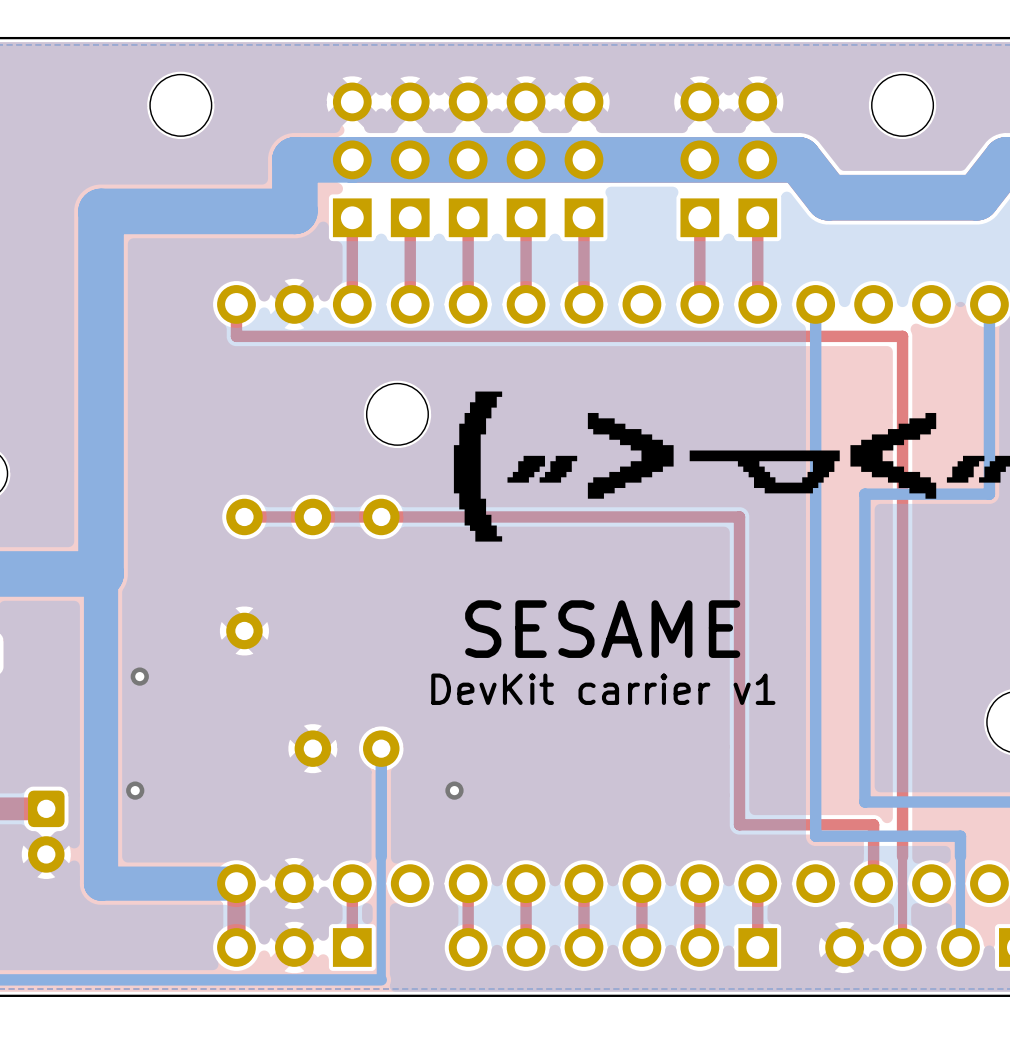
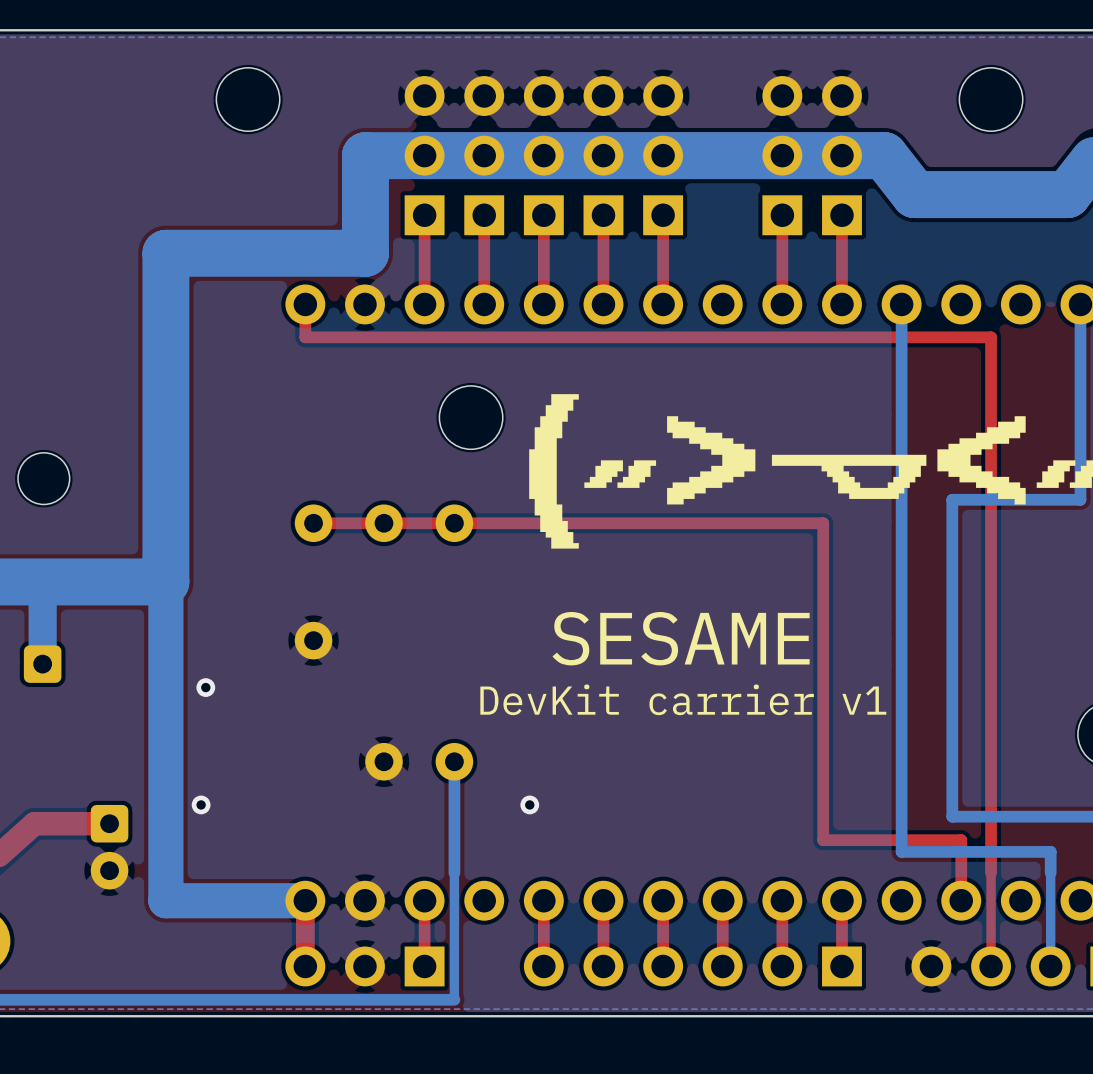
bottom track: (294, 211) (101, 211) (101, 254) -> (365, 208) (365, 253) (165, 253)

